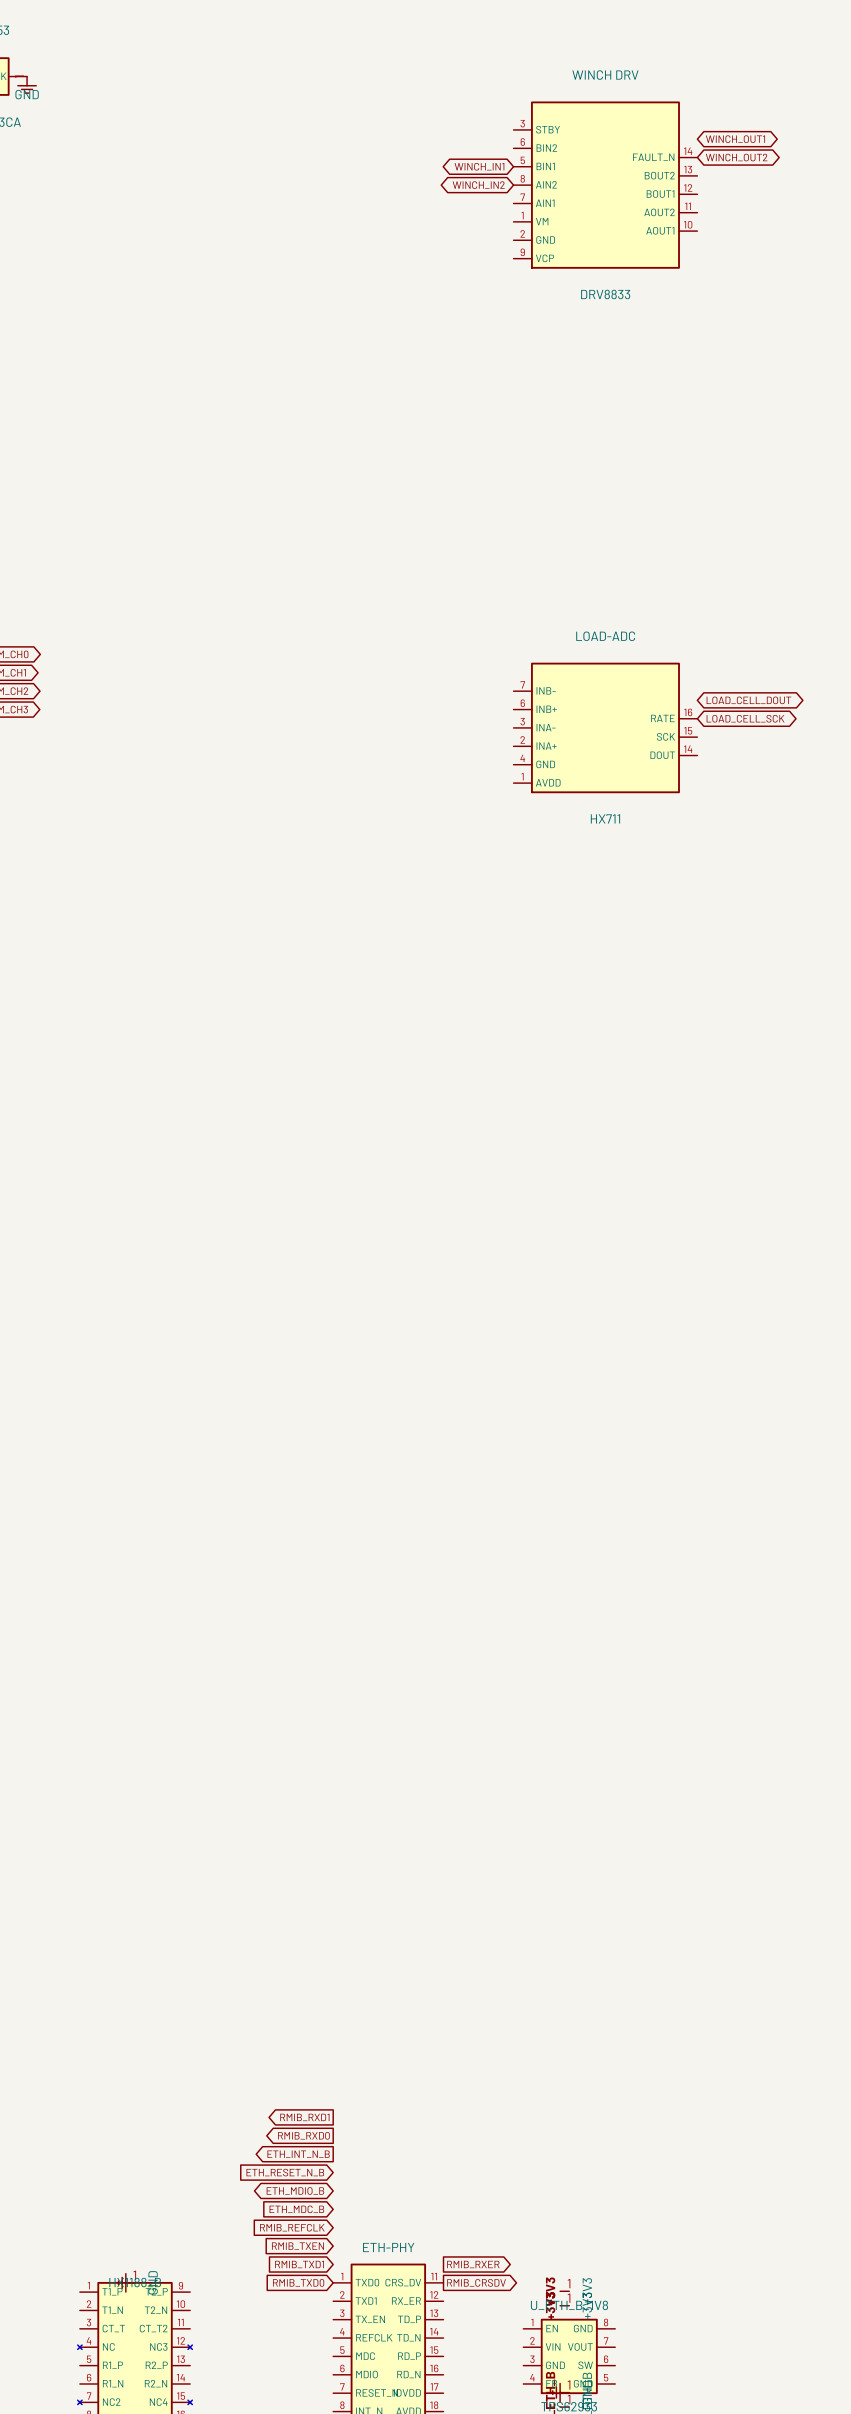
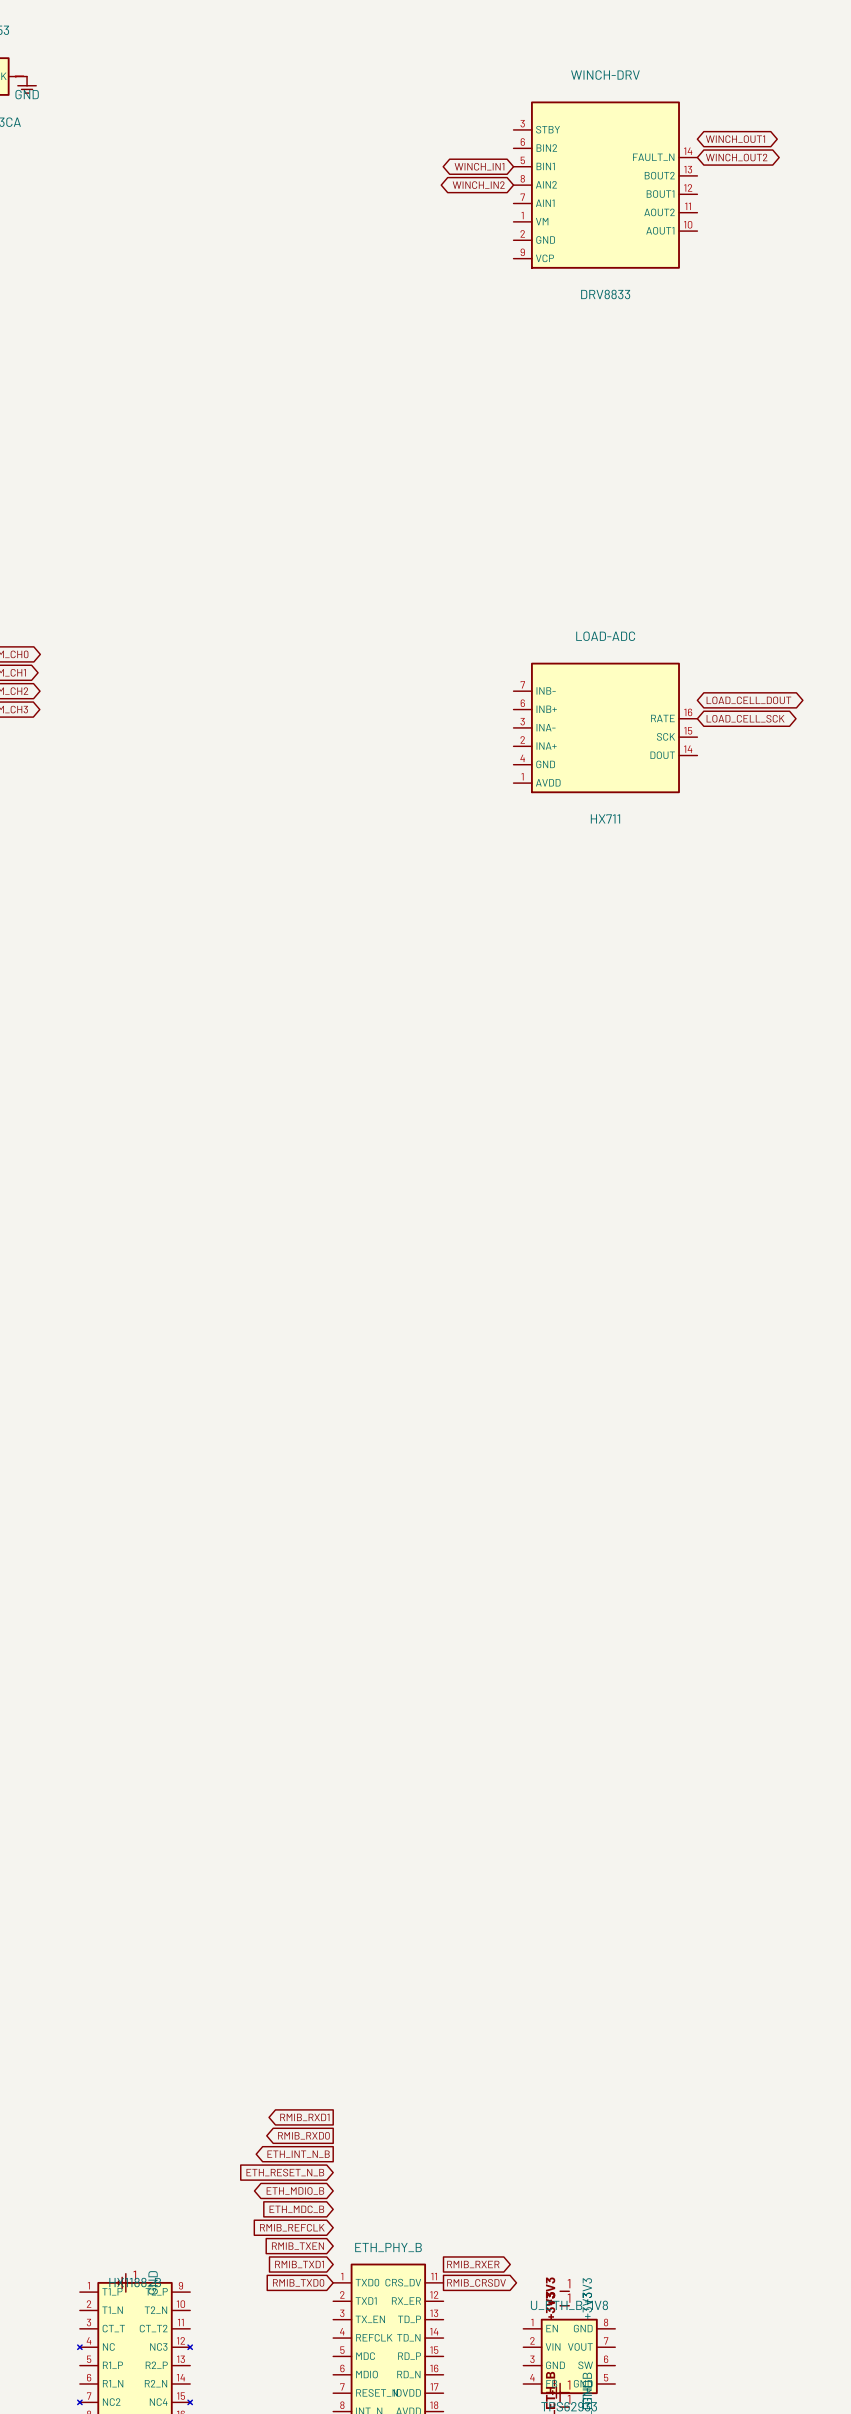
WINCH DRV name: WINCH DRV (605, 75) -> WINCH-DRV (605, 75)
ETH-PHY name: ETH-PHY (388, 2247) -> ETH_PHY_B (388, 2247)

